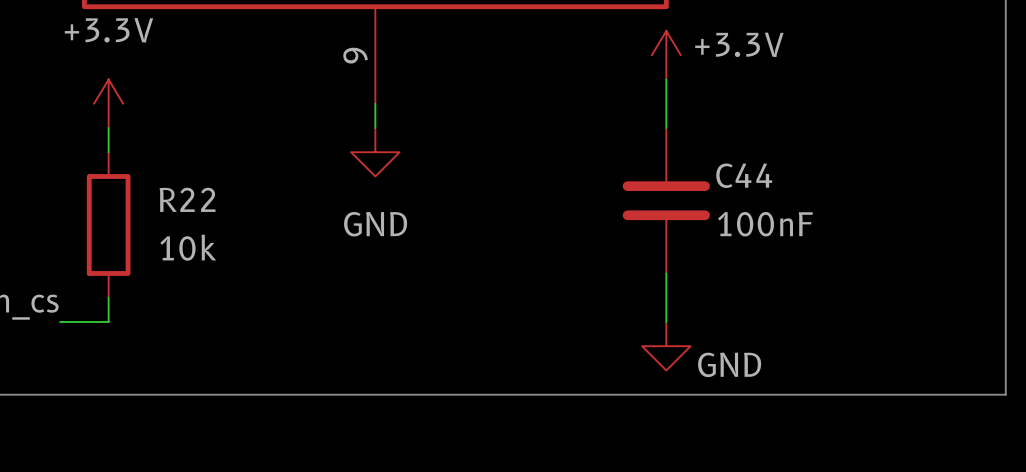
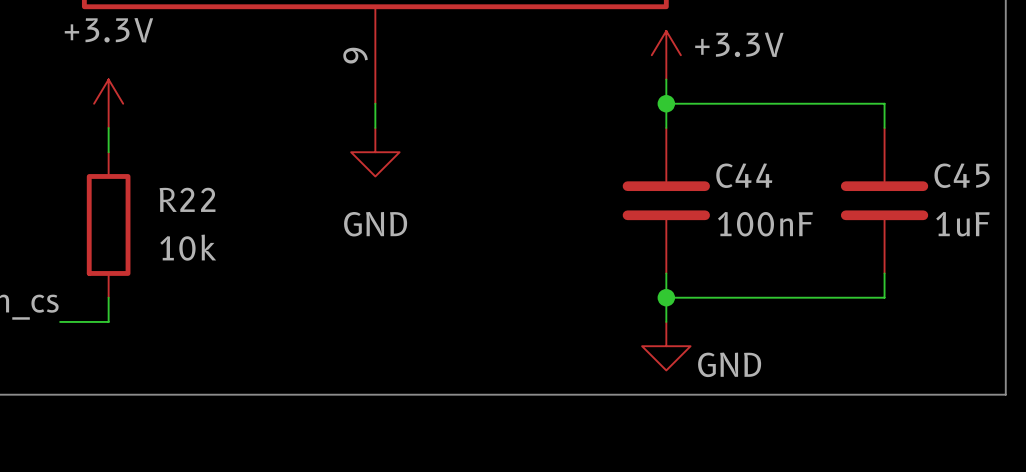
wire: none -> (666, 103) (884, 103) (884, 127)
junction: none -> (666, 103)
C45: none -> 1uF (884, 200)
wire: none -> (884, 273) (884, 297) (666, 297)
junction: none -> (666, 297)

